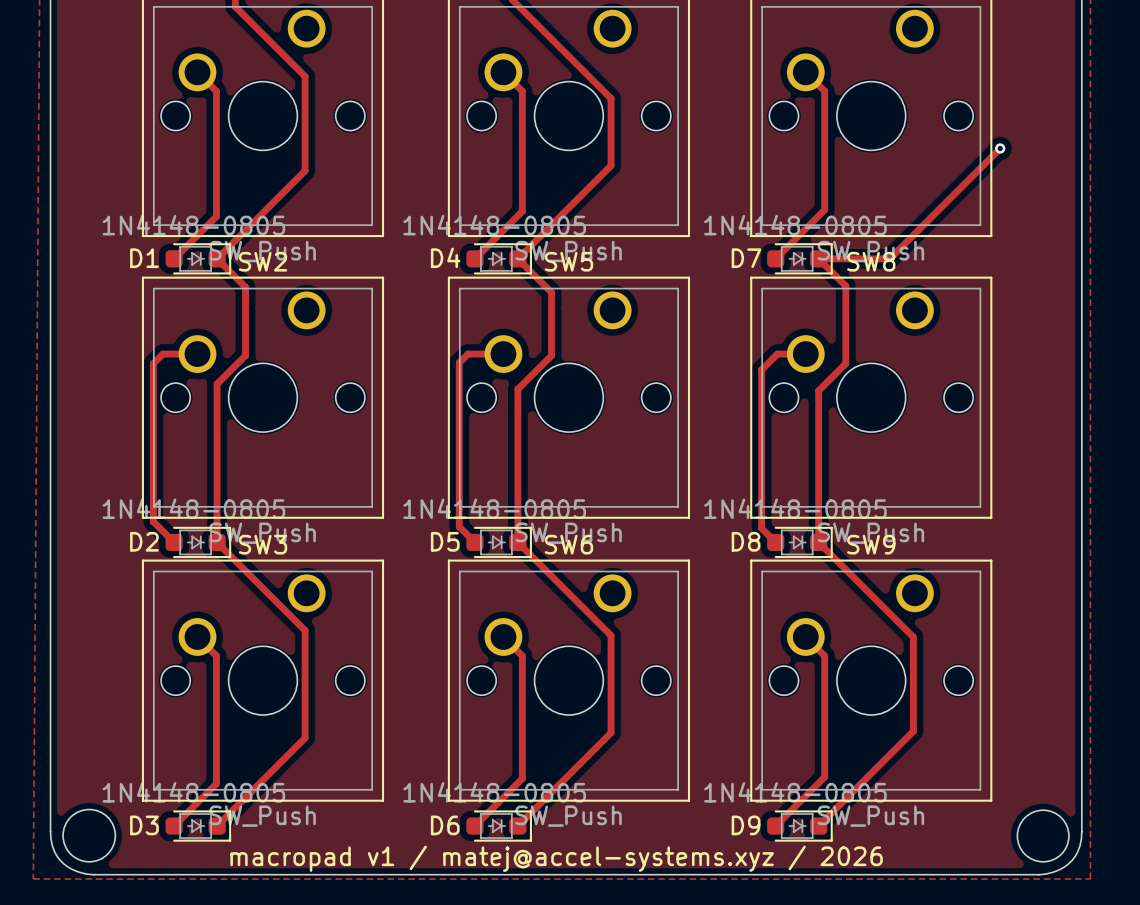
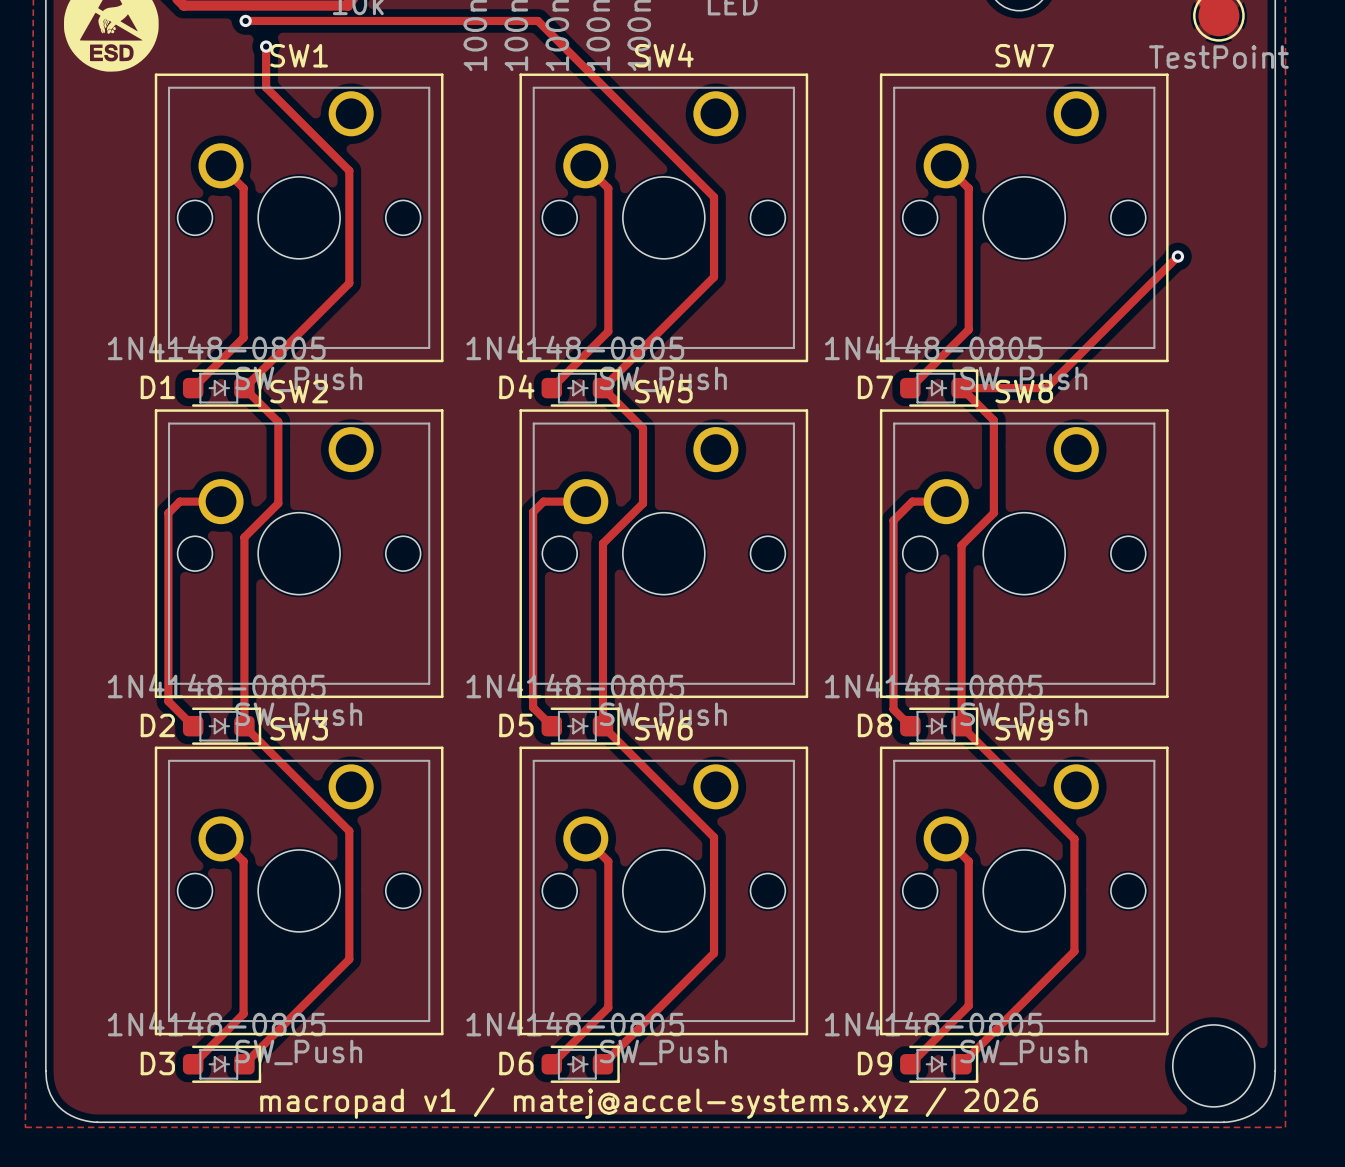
round board edge: [62, 809, 116, 863] -> none
round board edge size: [1016, 809, 1070, 863] -> [1172, 1024, 1256, 1108]

